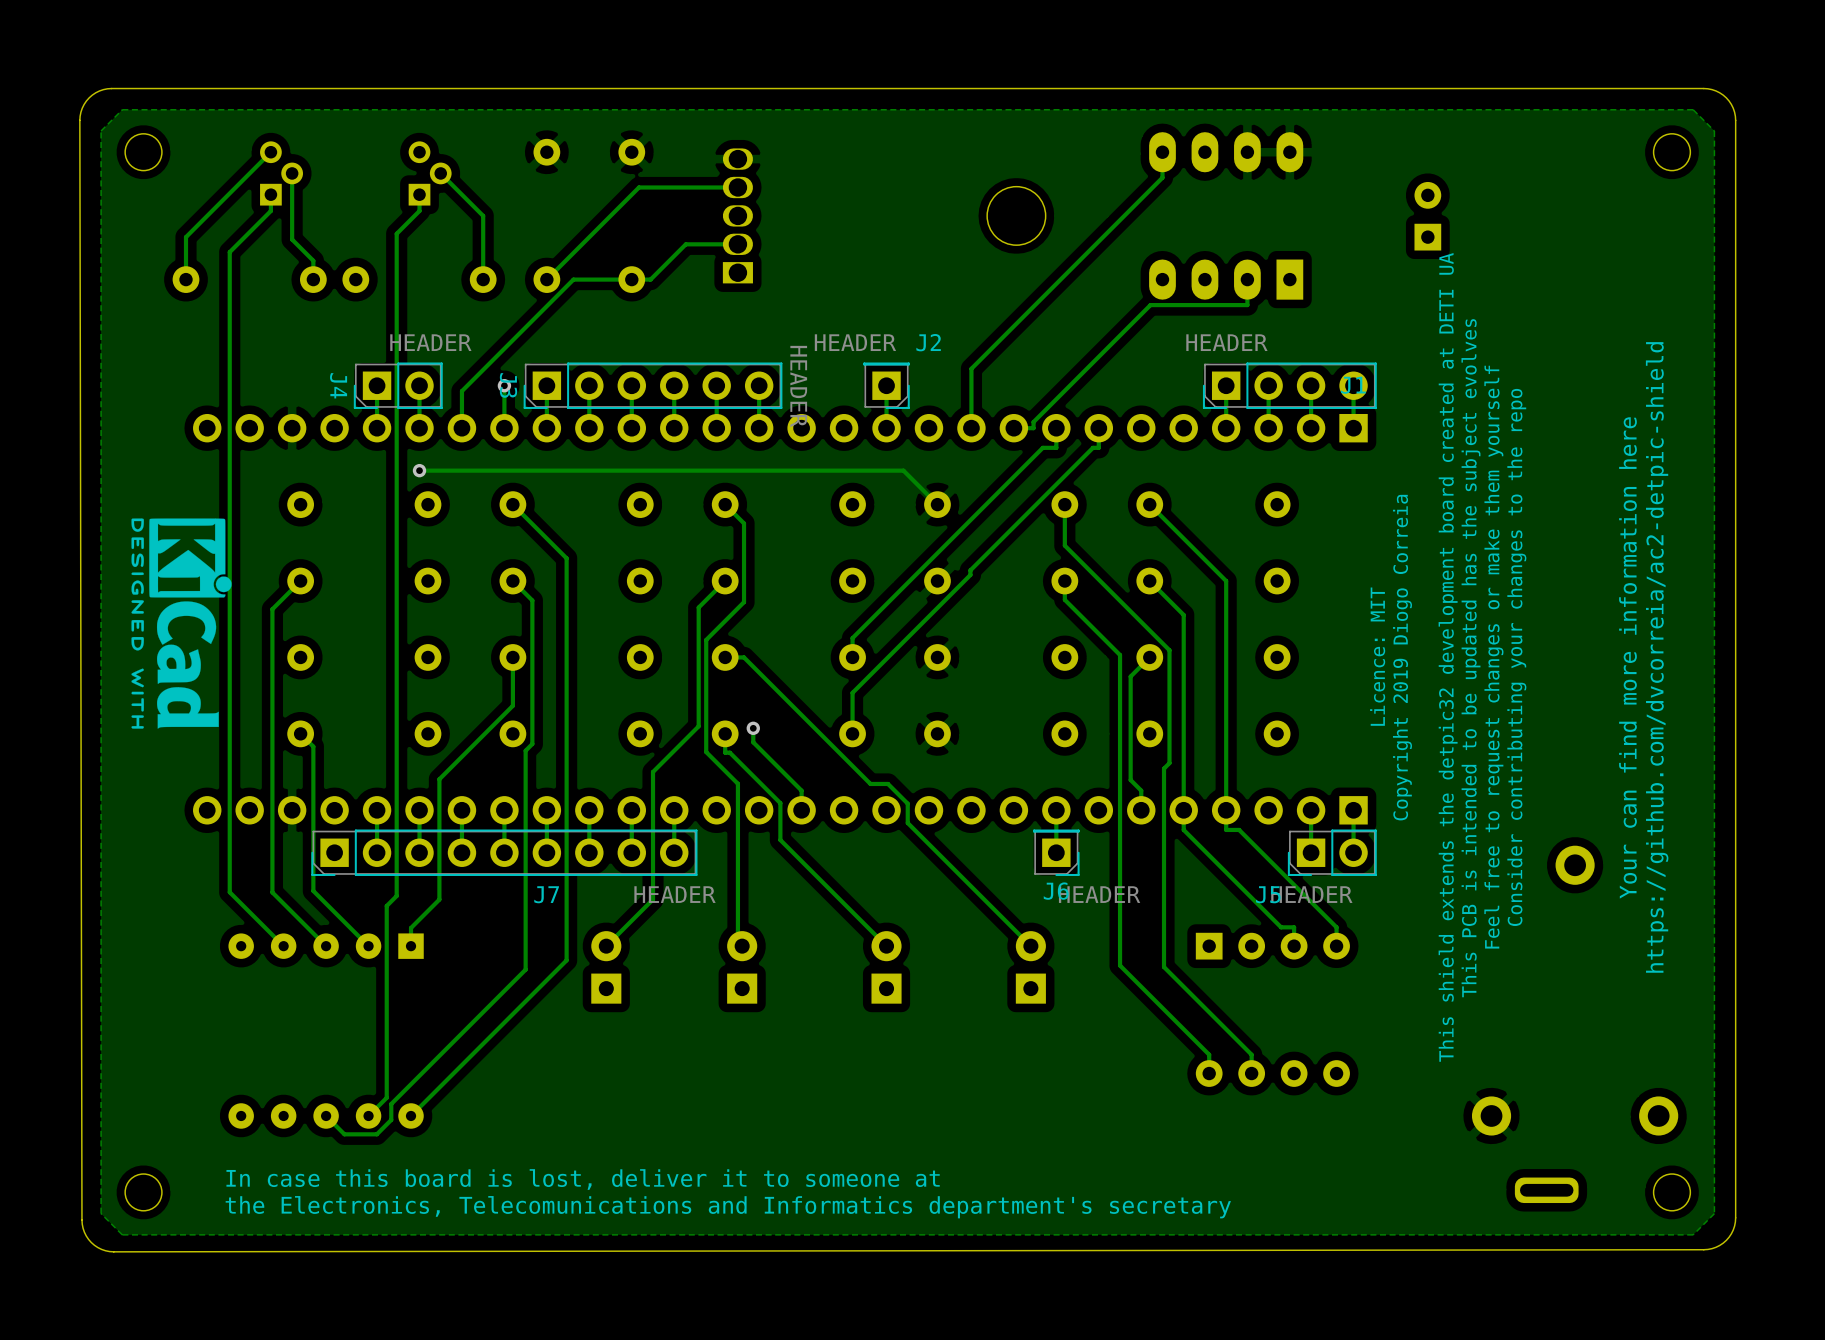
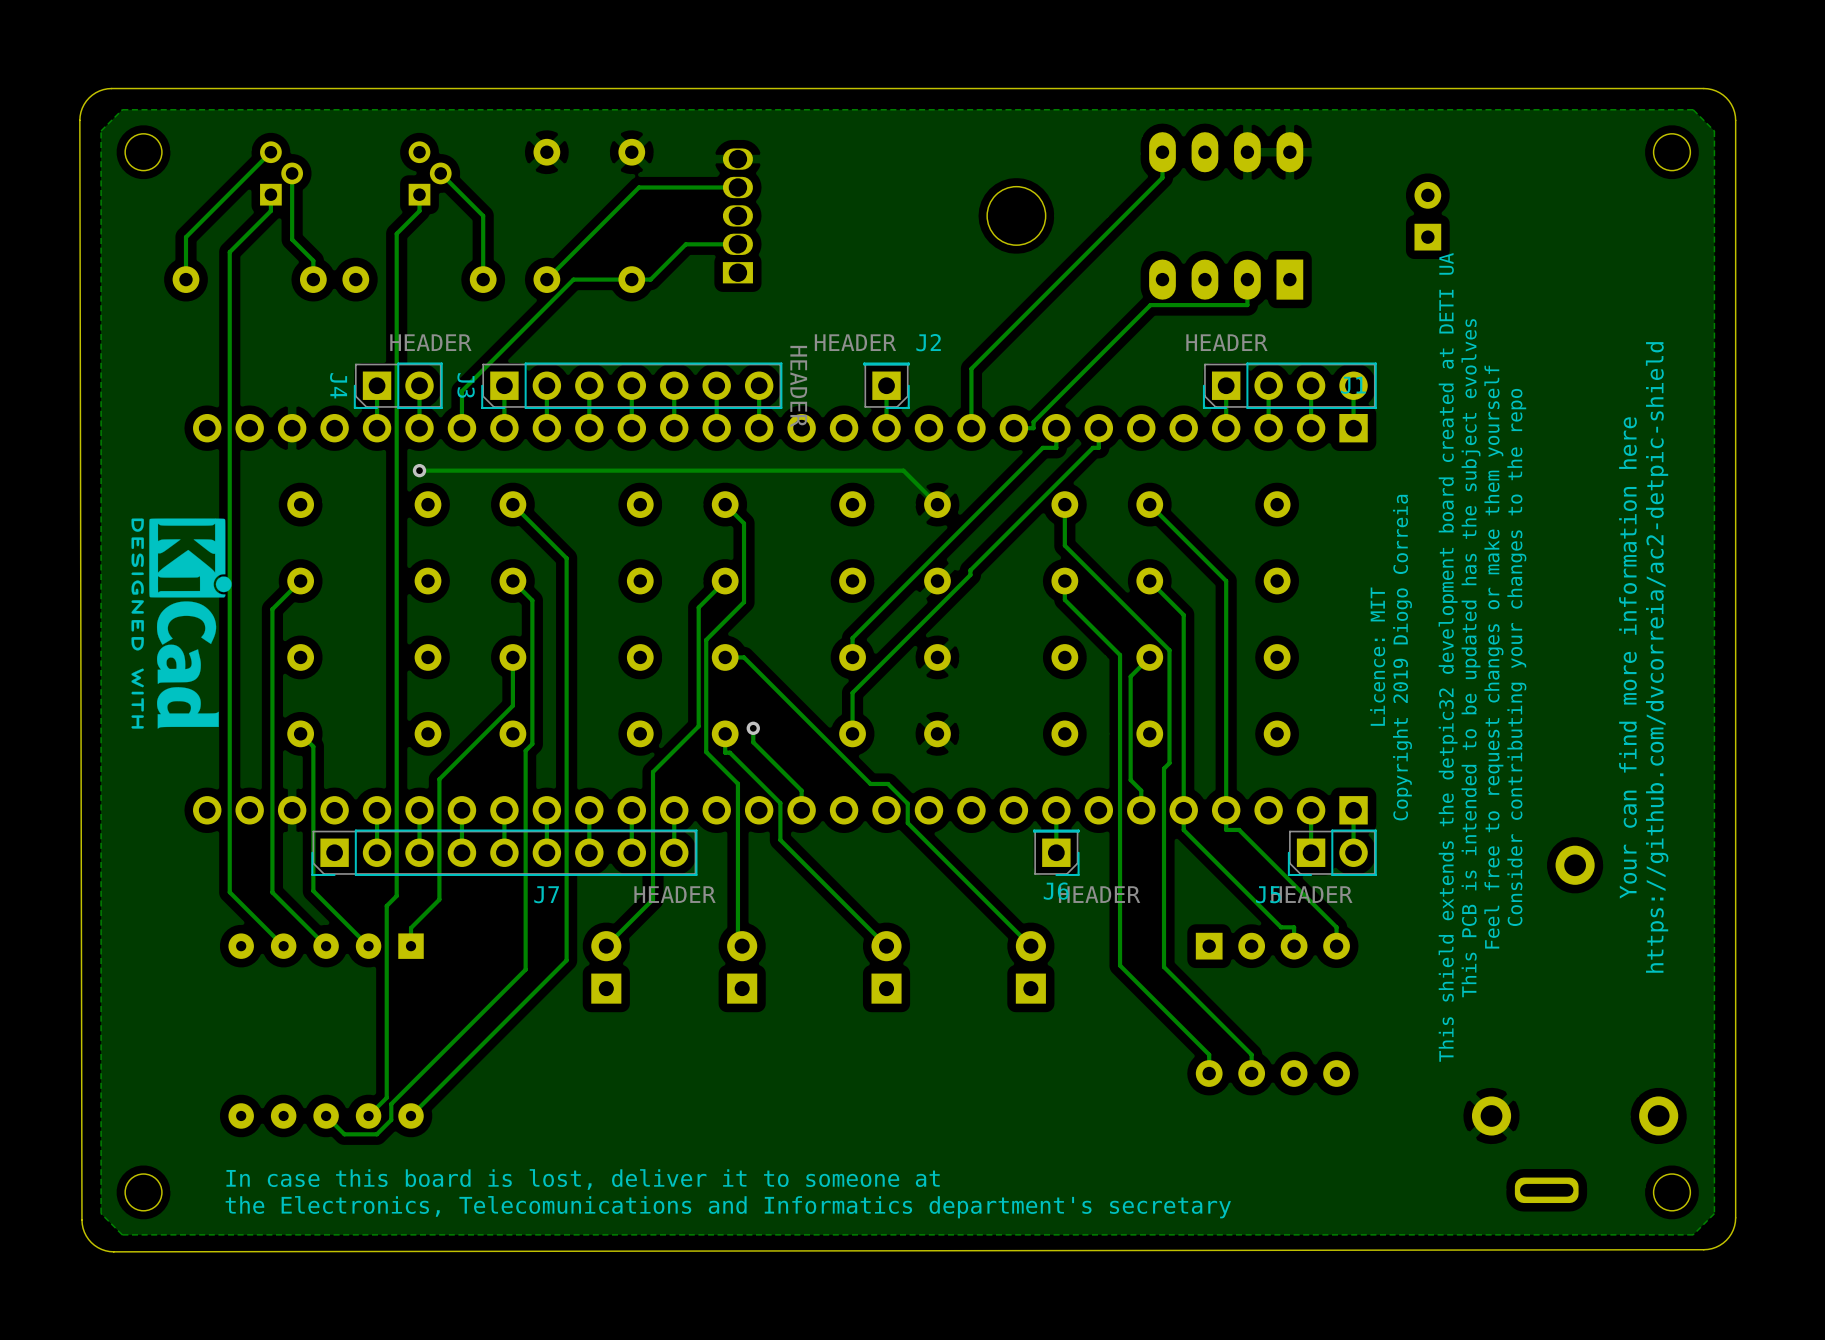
J3 footprint: [523, 362, 783, 409] -> [481, 362, 783, 409]
via: (504, 385) -> none

